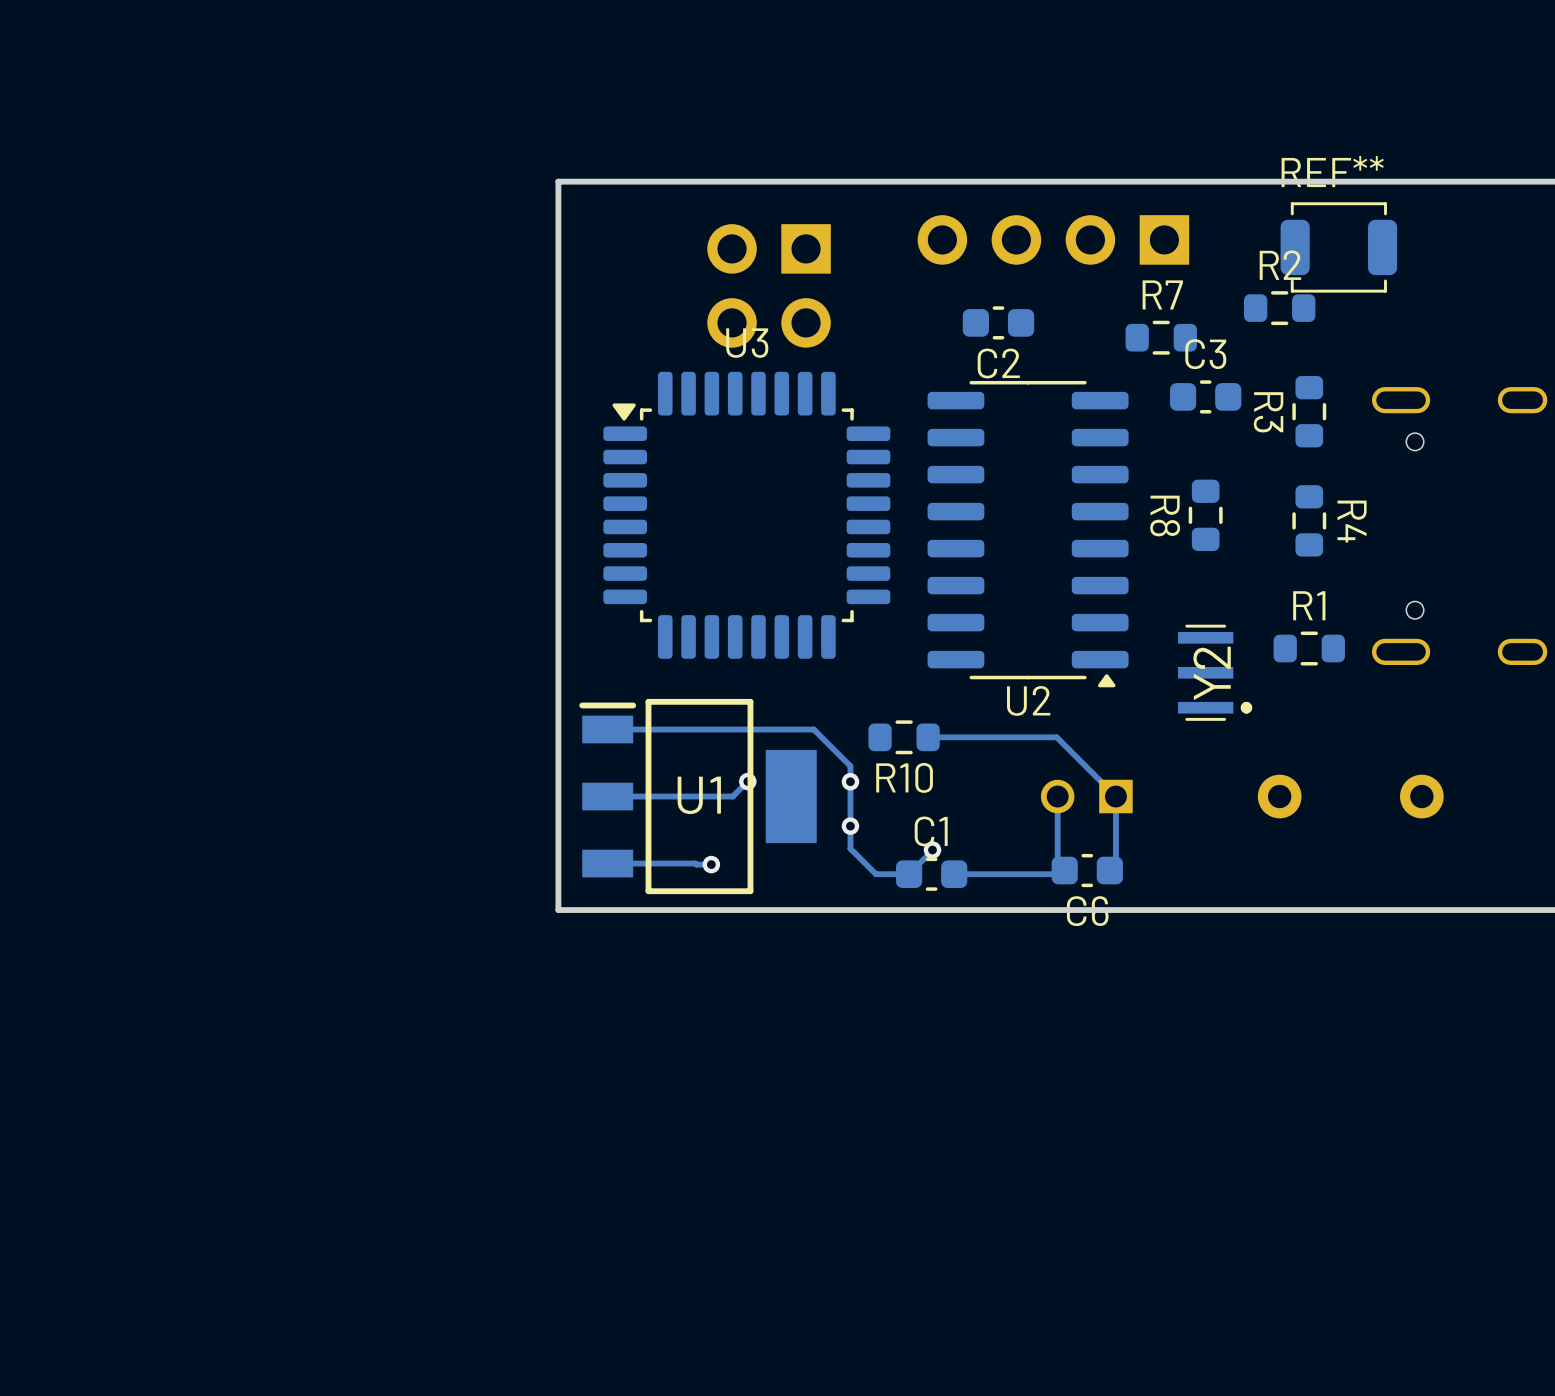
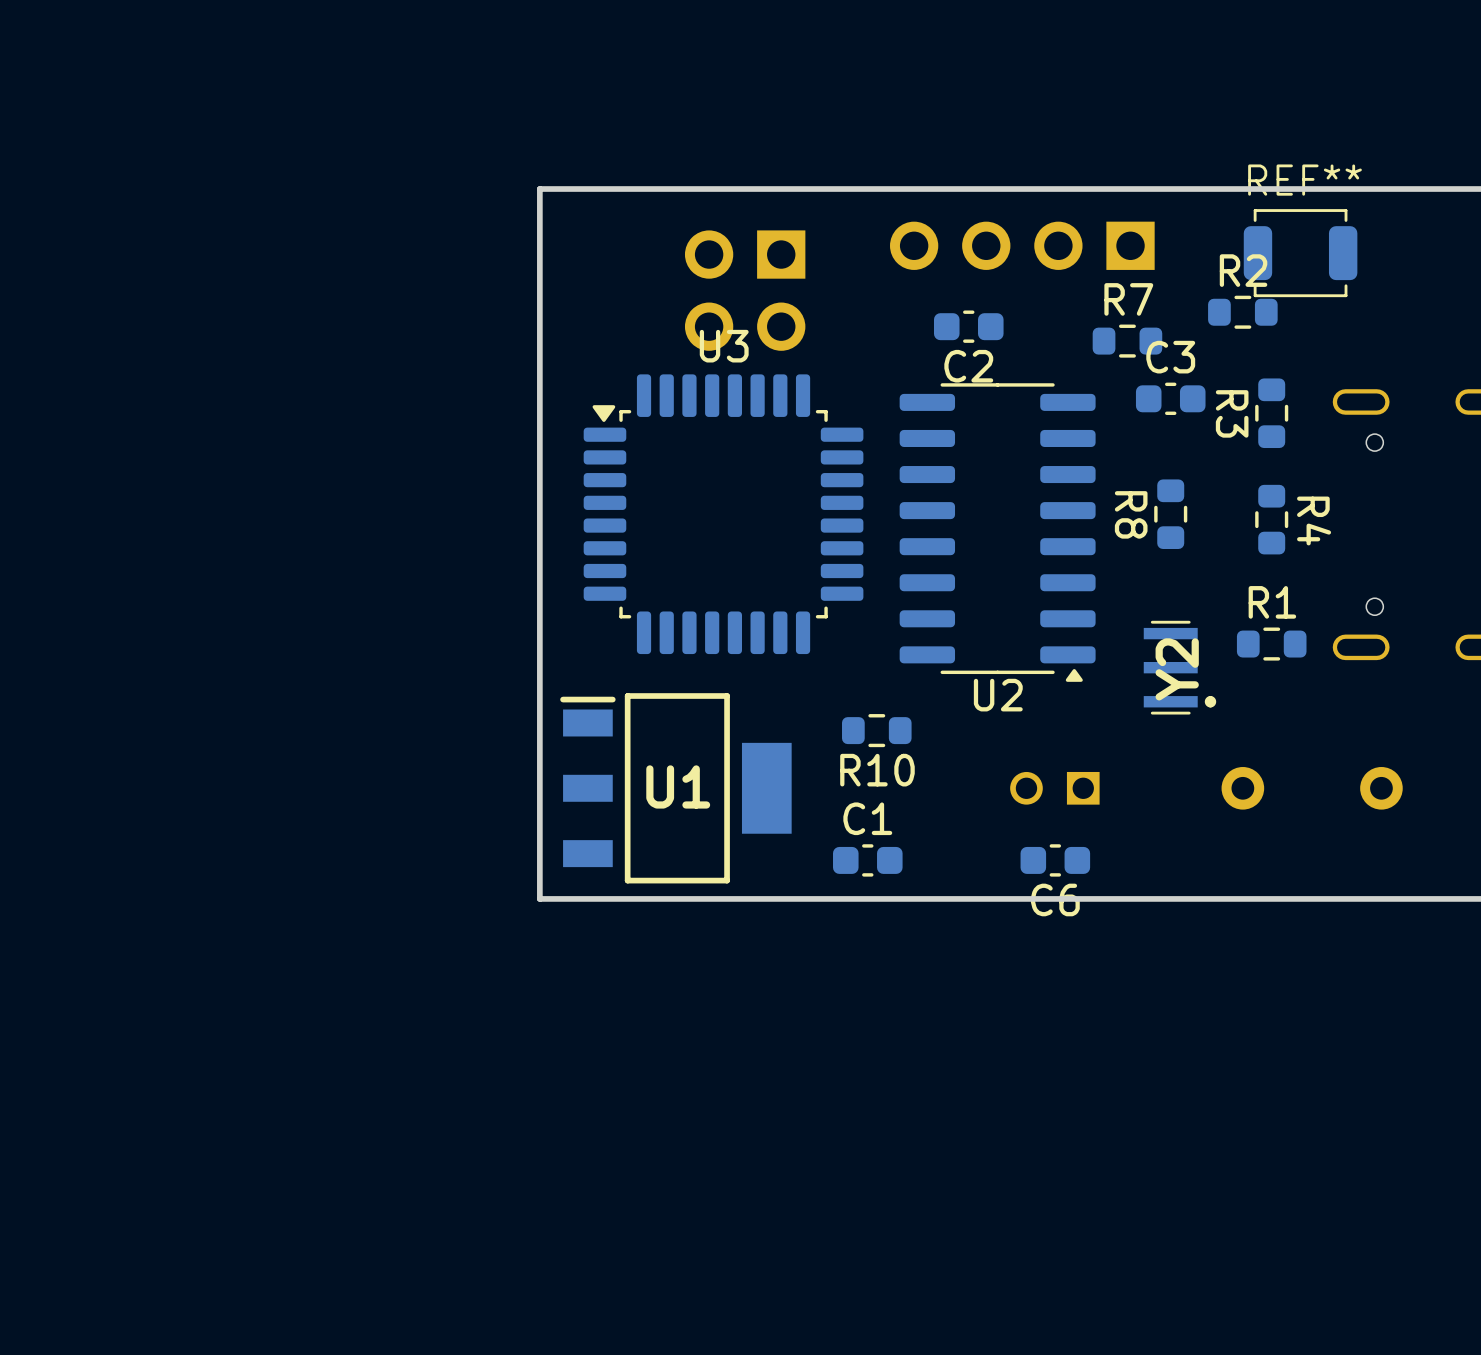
track: (607, 729) (813, 729) (850, 766) (850, 848) (875, 874) (909, 874) (933, 850) -> none
track: (928, 737) (1056, 737) (1115, 796) (1115, 864) (1109, 870) -> none
track: (747, 781) (732, 796) (607, 796) -> none
via: (747, 781) -> none
via: (850, 781) -> none
track: (1057, 796) (1057, 863) (1064, 870) (1061, 874) (954, 874) -> none
via: (850, 826) -> none
via: (932, 850) -> none
track: (607, 863) (711, 864) -> none
via: (711, 864) -> none
C1 position: (931, 874) -> (867, 860)

